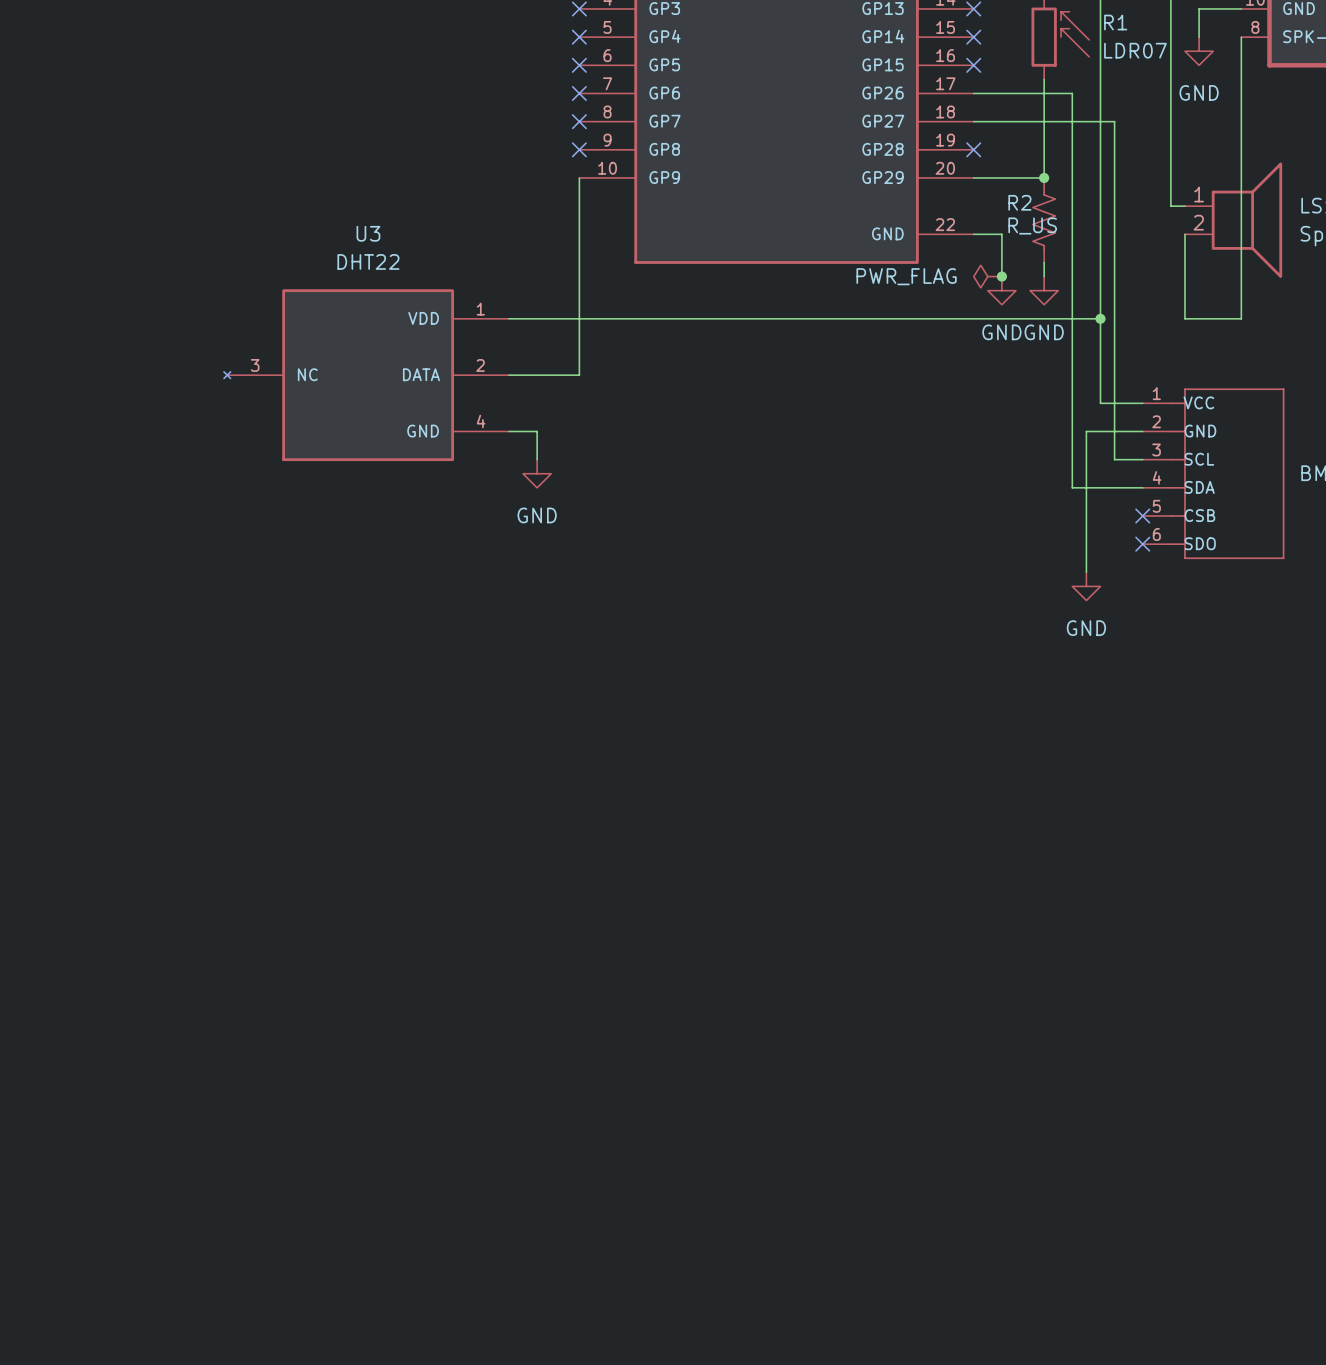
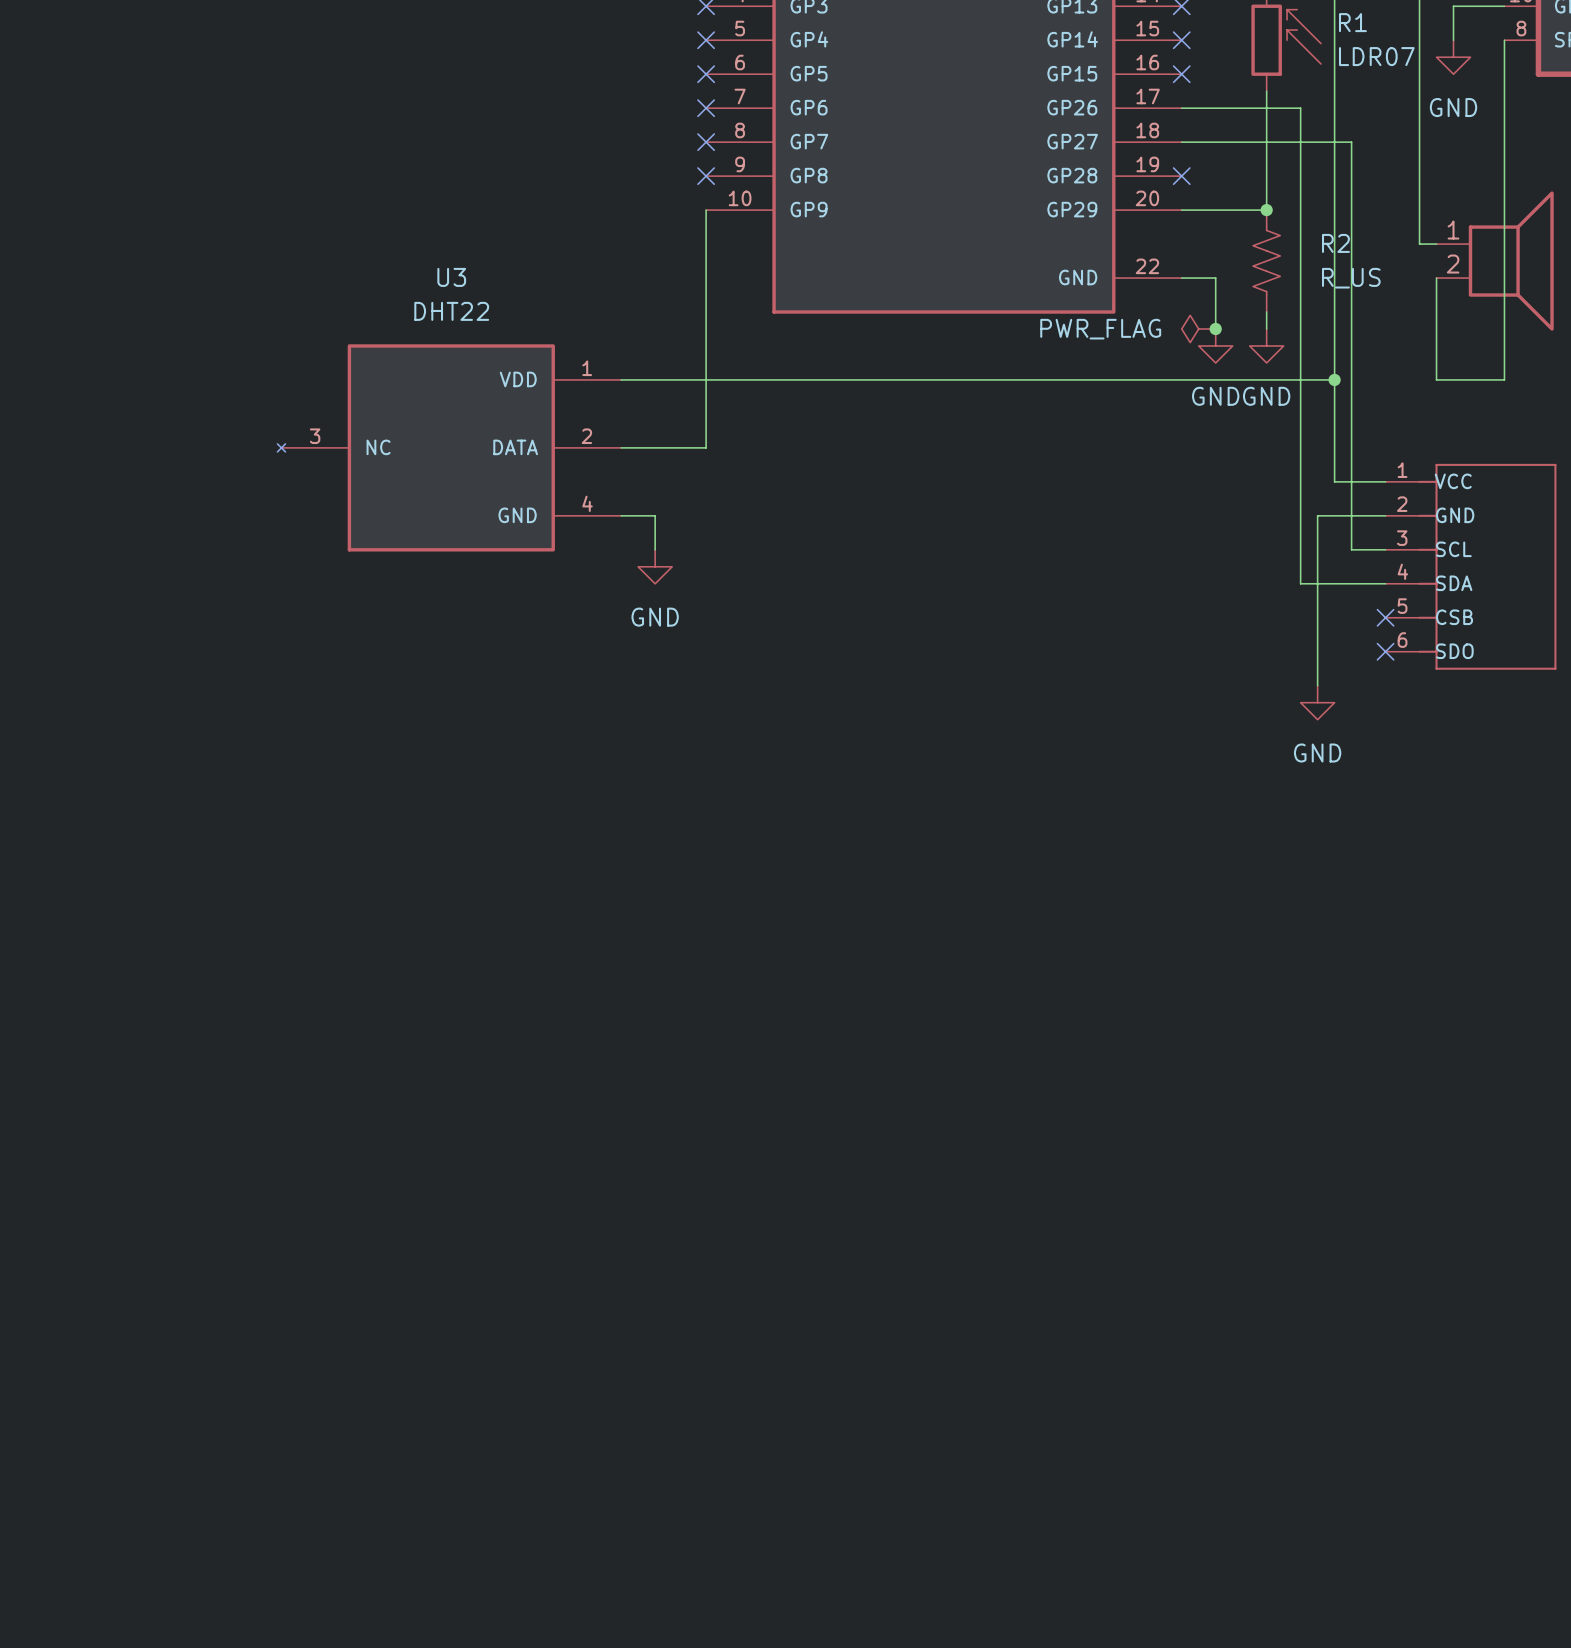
R2 name position: R2 (1019, 202) -> R2 (1335, 243)
R2 value position: R_US (1032, 226) -> R_US (1351, 278)

